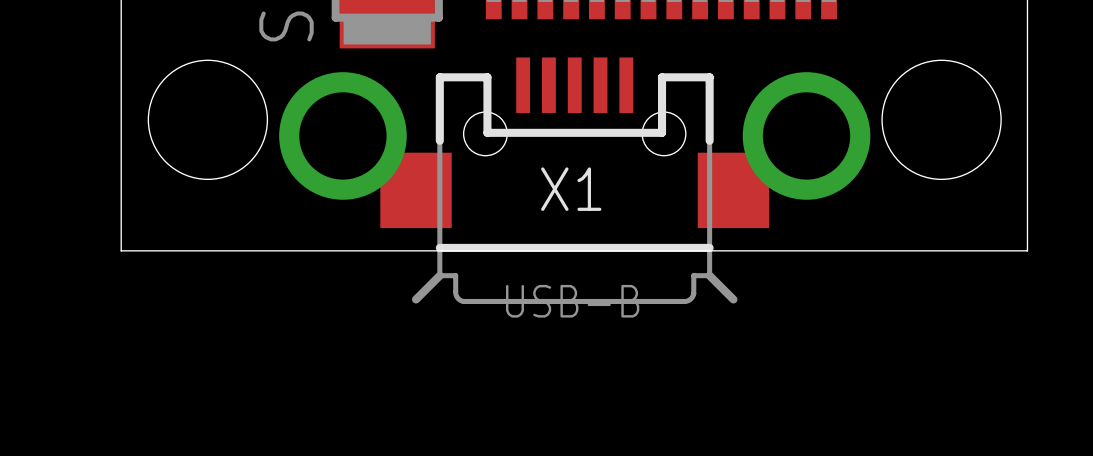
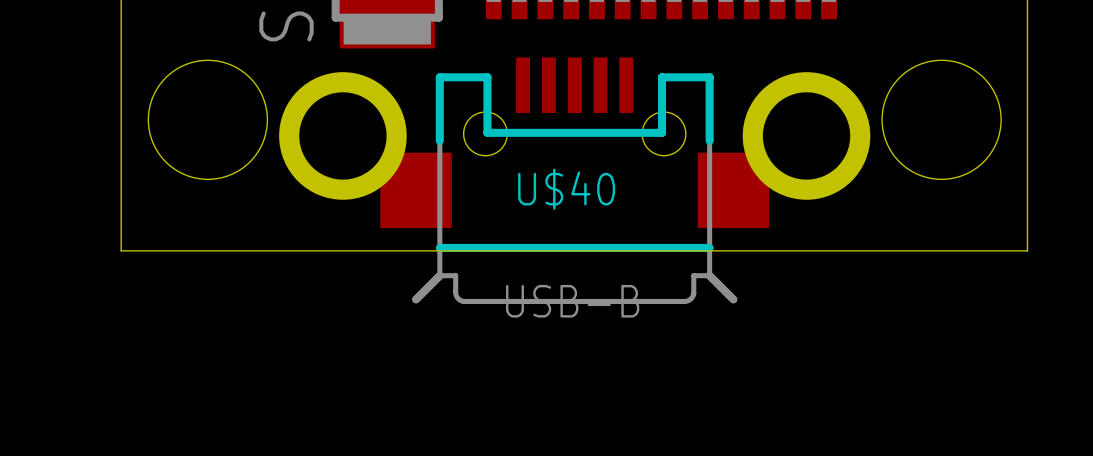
X1 name: X1 (571, 189) -> U$40 (566, 189)

